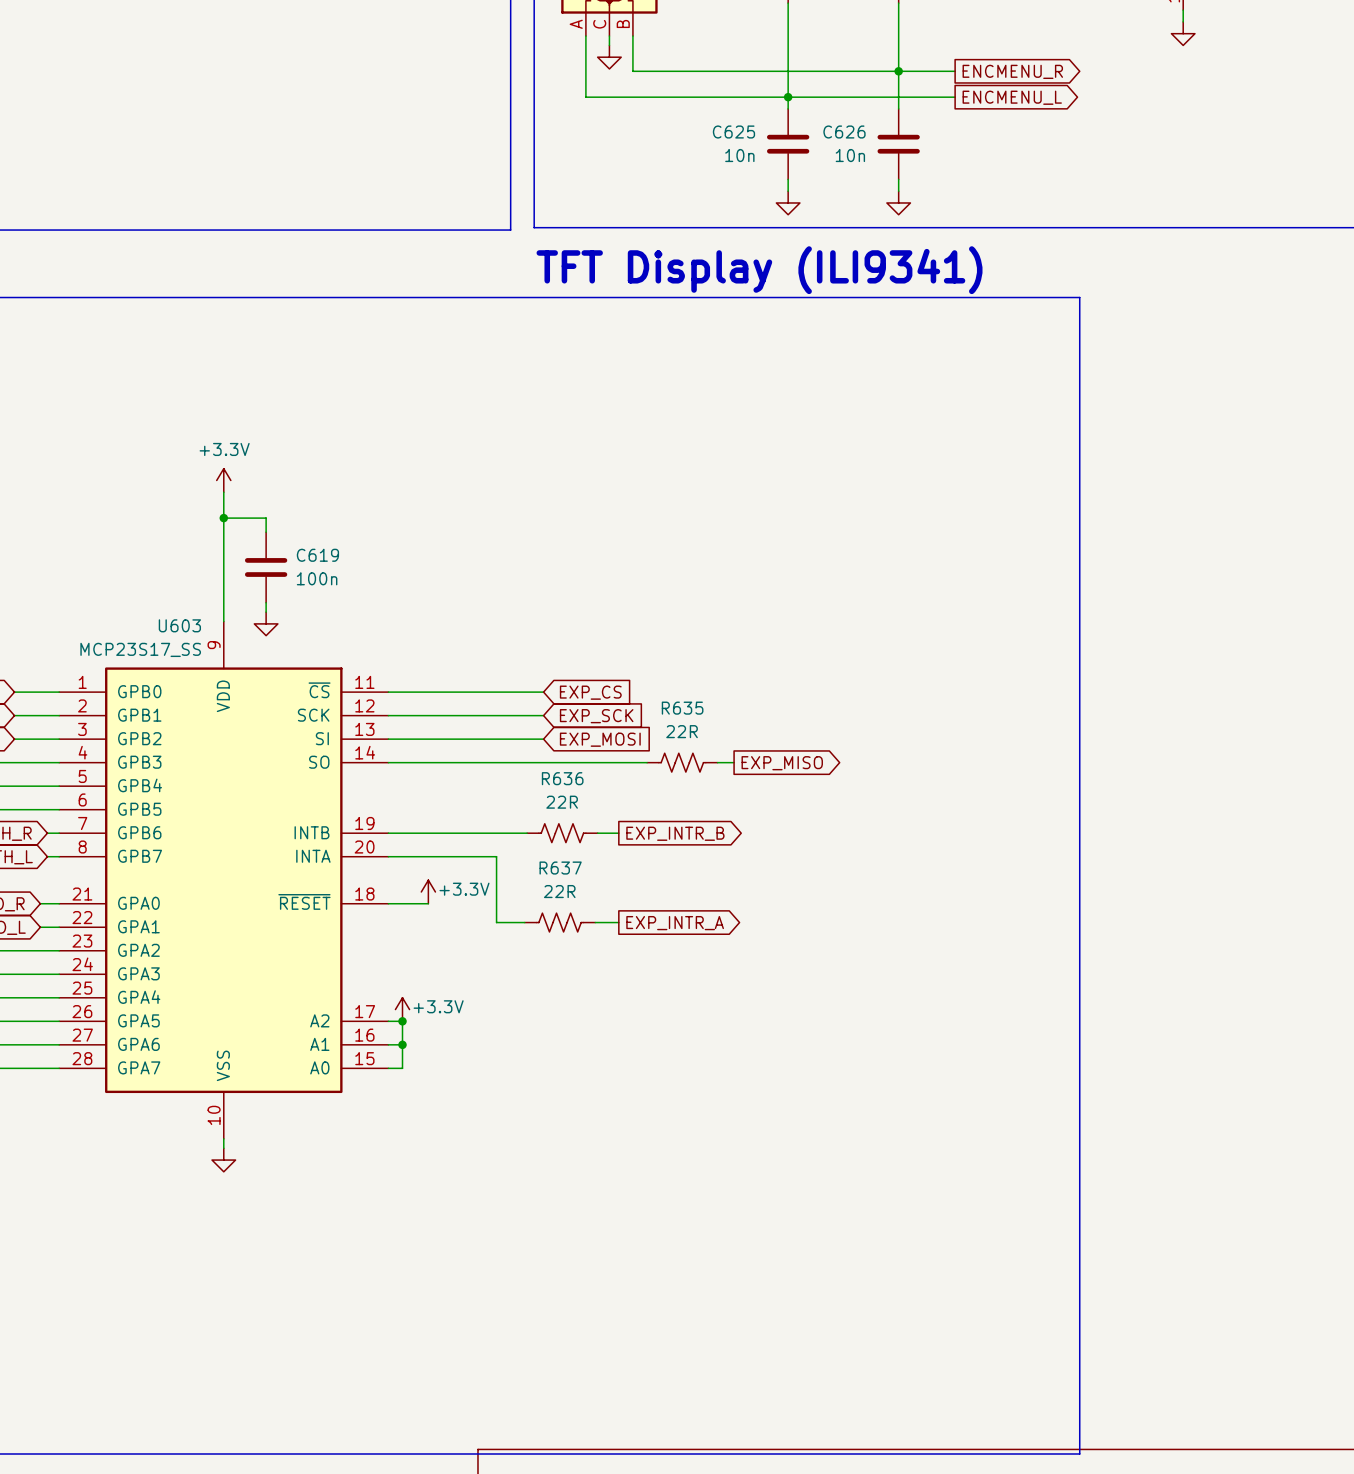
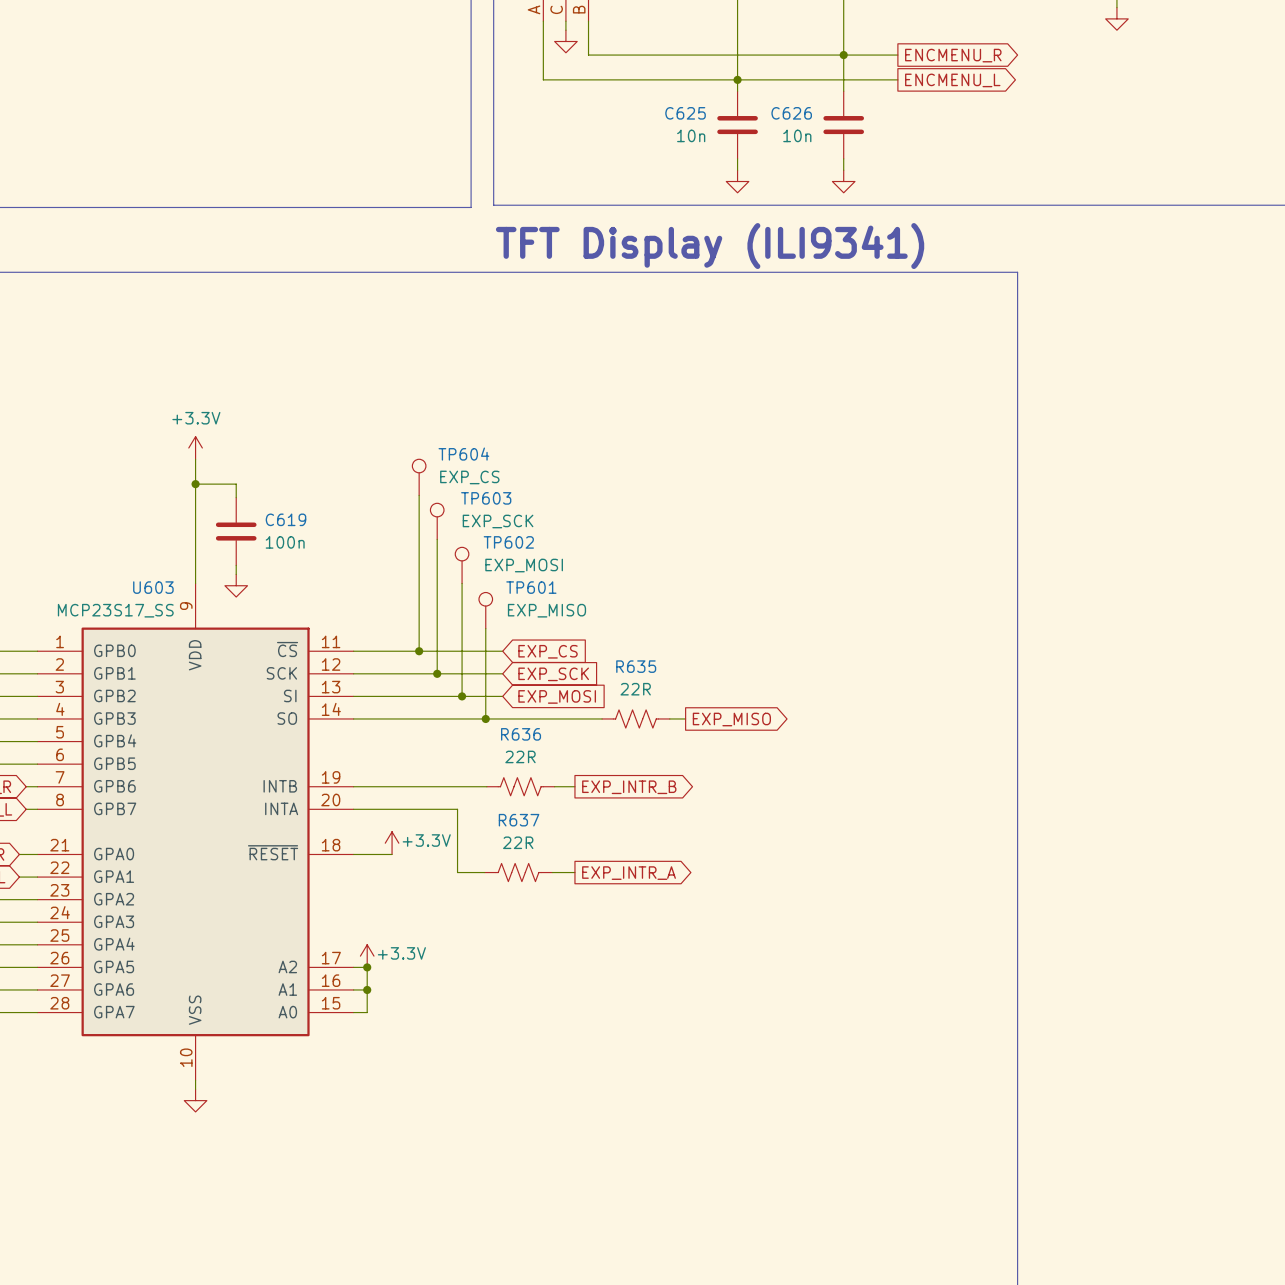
TP604: none -> EXP_CS (419, 477)
wire: none -> (419, 495) (419, 651)
TP603: none -> EXP_SCK (437, 521)
wire: none -> (437, 539) (437, 673)
TP602: none -> EXP_MOSI (462, 565)
wire: none -> (462, 583) (462, 696)
TP601: none -> EXP_MISO (485, 610)
wire: none -> (485, 628) (485, 718)
junction: none -> (419, 651)
junction: none -> (437, 673)
junction: none -> (462, 696)
junction: none -> (485, 718)

